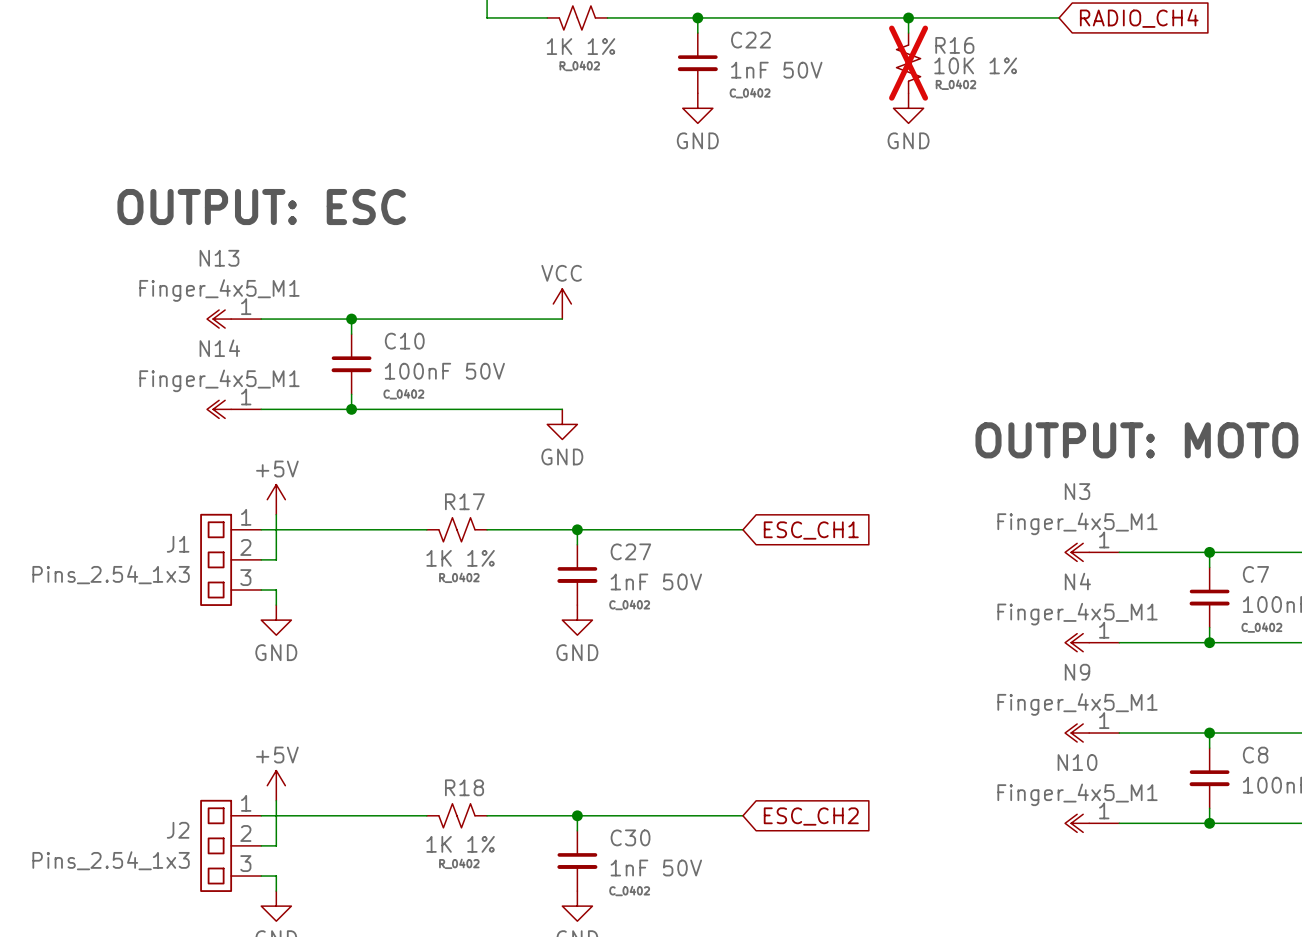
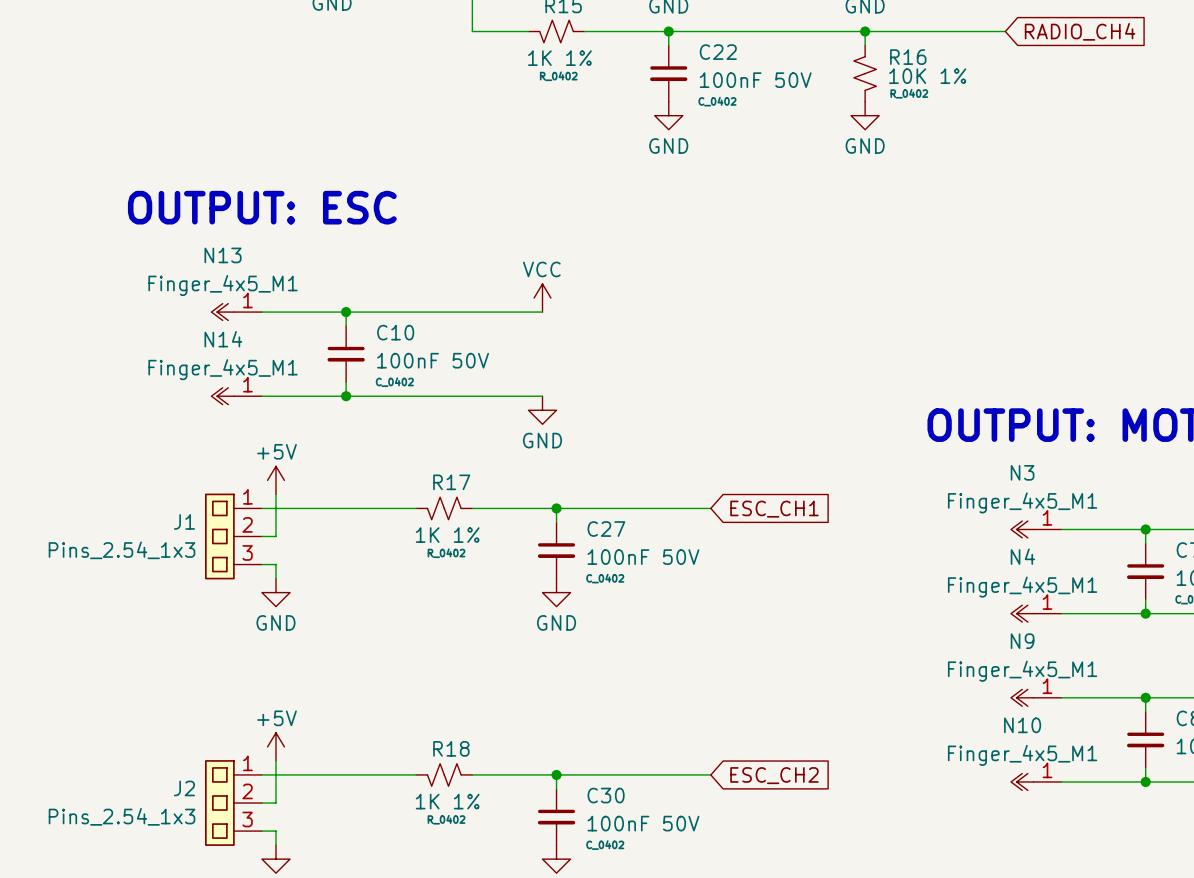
R16 do-not-place cross: (908, 63) -> none
C22 value: 1nF 50V (776, 70) -> 100nF 50V (755, 80)
C27 value: 1nF 50V (656, 581) -> 100nF 50V (643, 557)
C30 value: 1nF 50V (656, 867) -> 100nF 50V (643, 823)

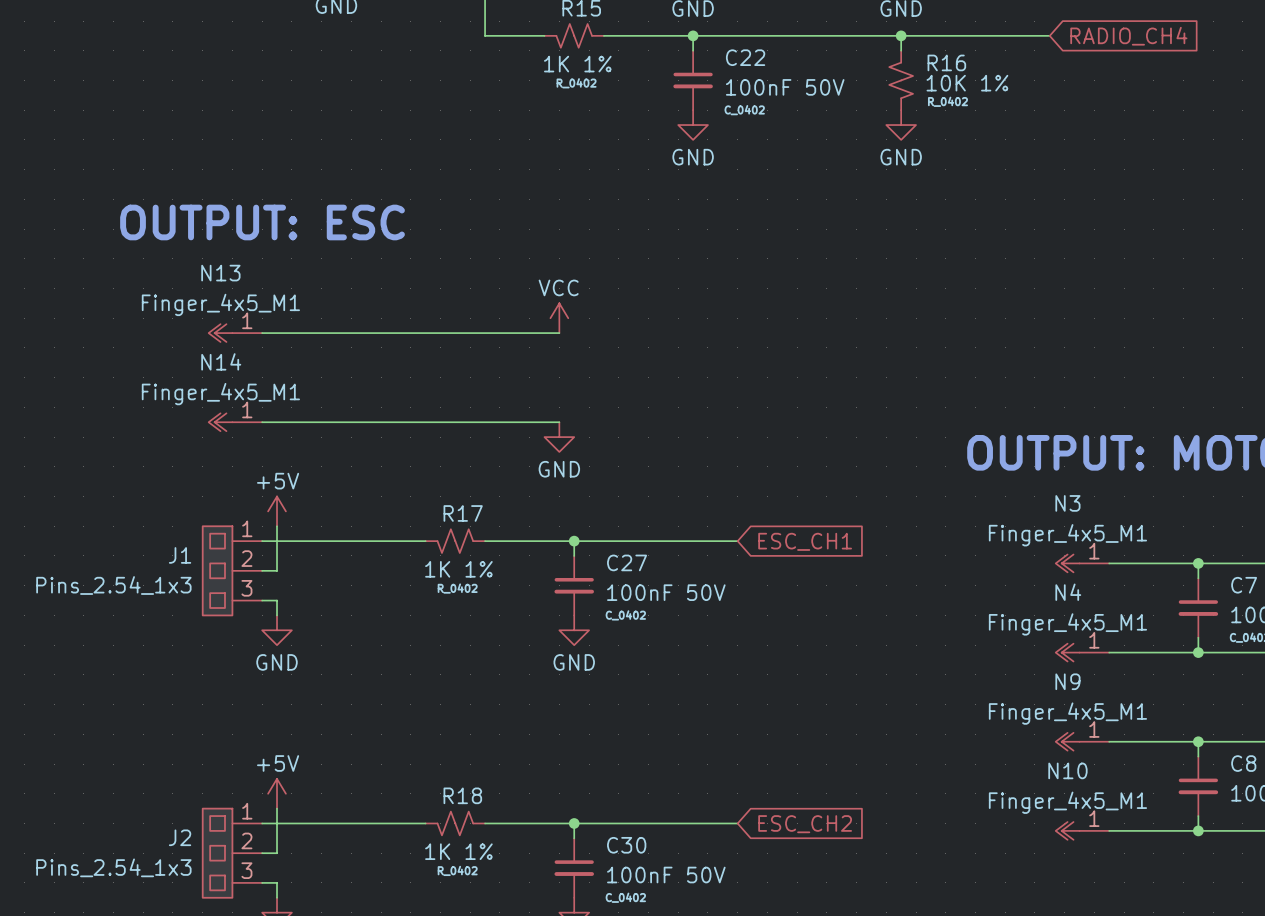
wire: (346, 312) (346, 326) -> none
junction: (346, 312) -> none
C10: 100nF 50V (346, 354) -> none
wire: (346, 382) (346, 396) -> none
junction: (346, 396) -> none

